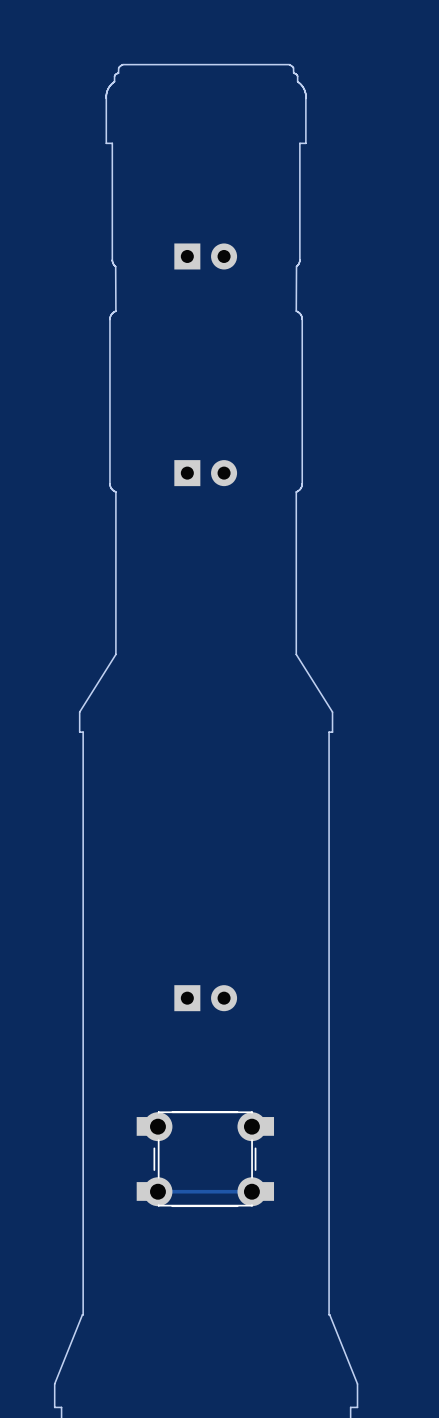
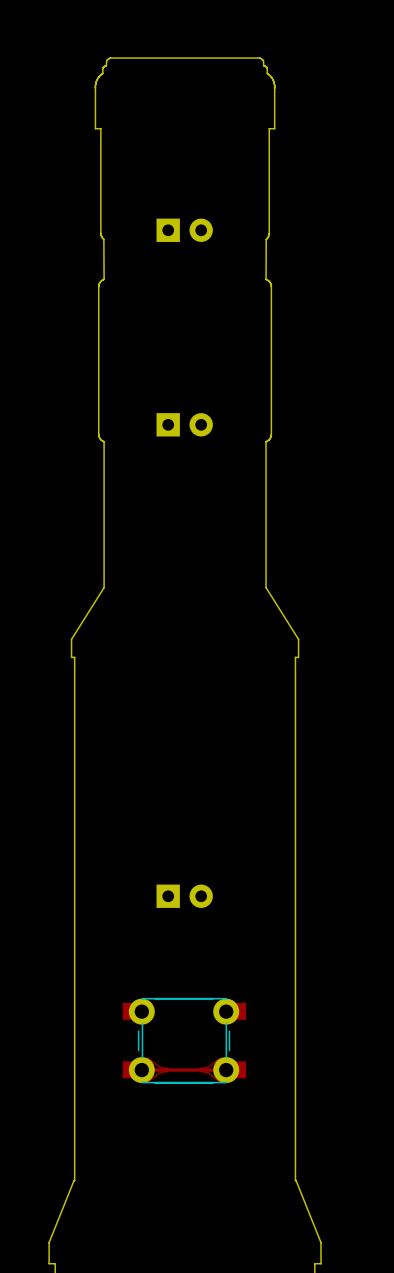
zone outline: none -> (147, 1058) (160, 1067) (167, 1068) (167, 1071) (160, 1073) (147, 1081) (135, 1070) (147, 1058)
zone outline: none -> (220, 1058) (232, 1070) (220, 1081) (208, 1073) (200, 1071) (200, 1068) (208, 1067) (220, 1058)

